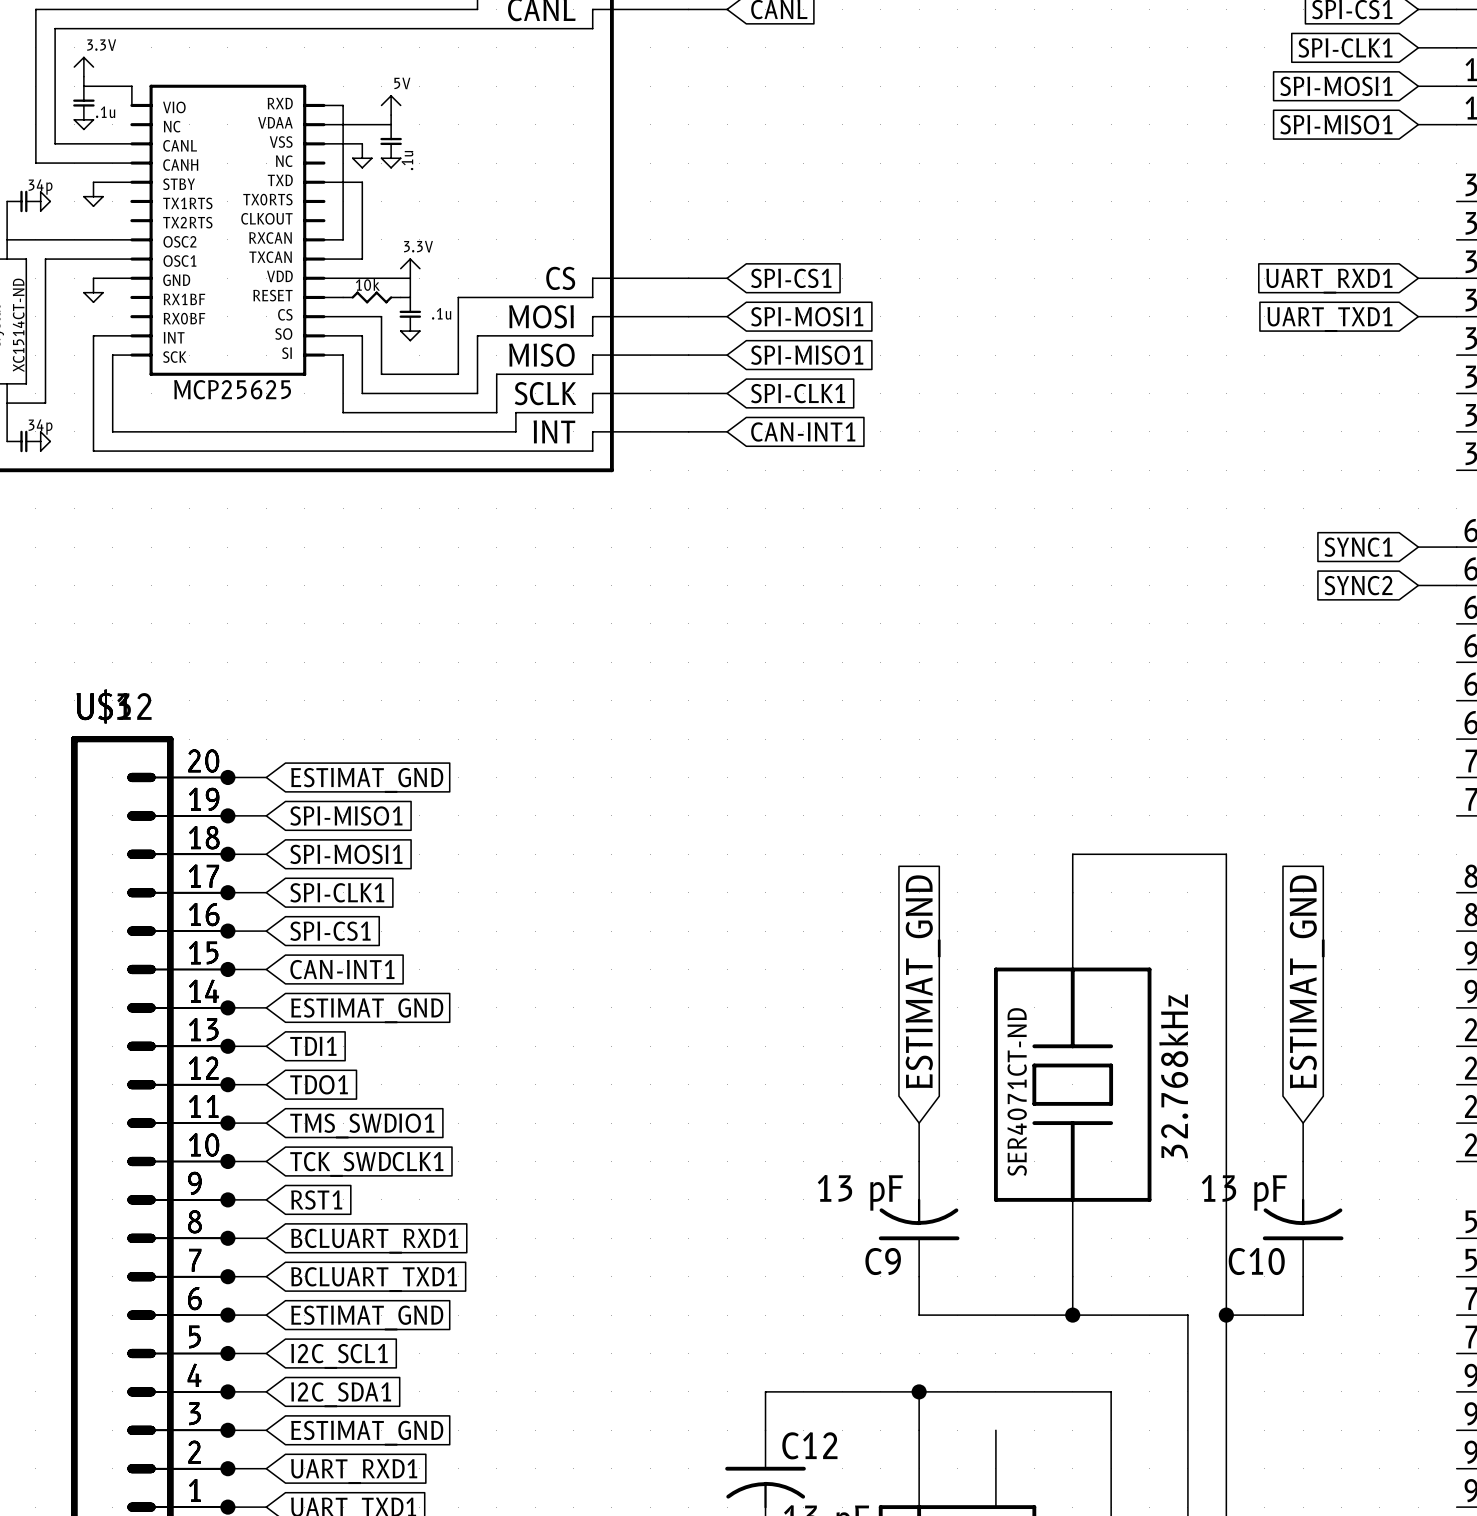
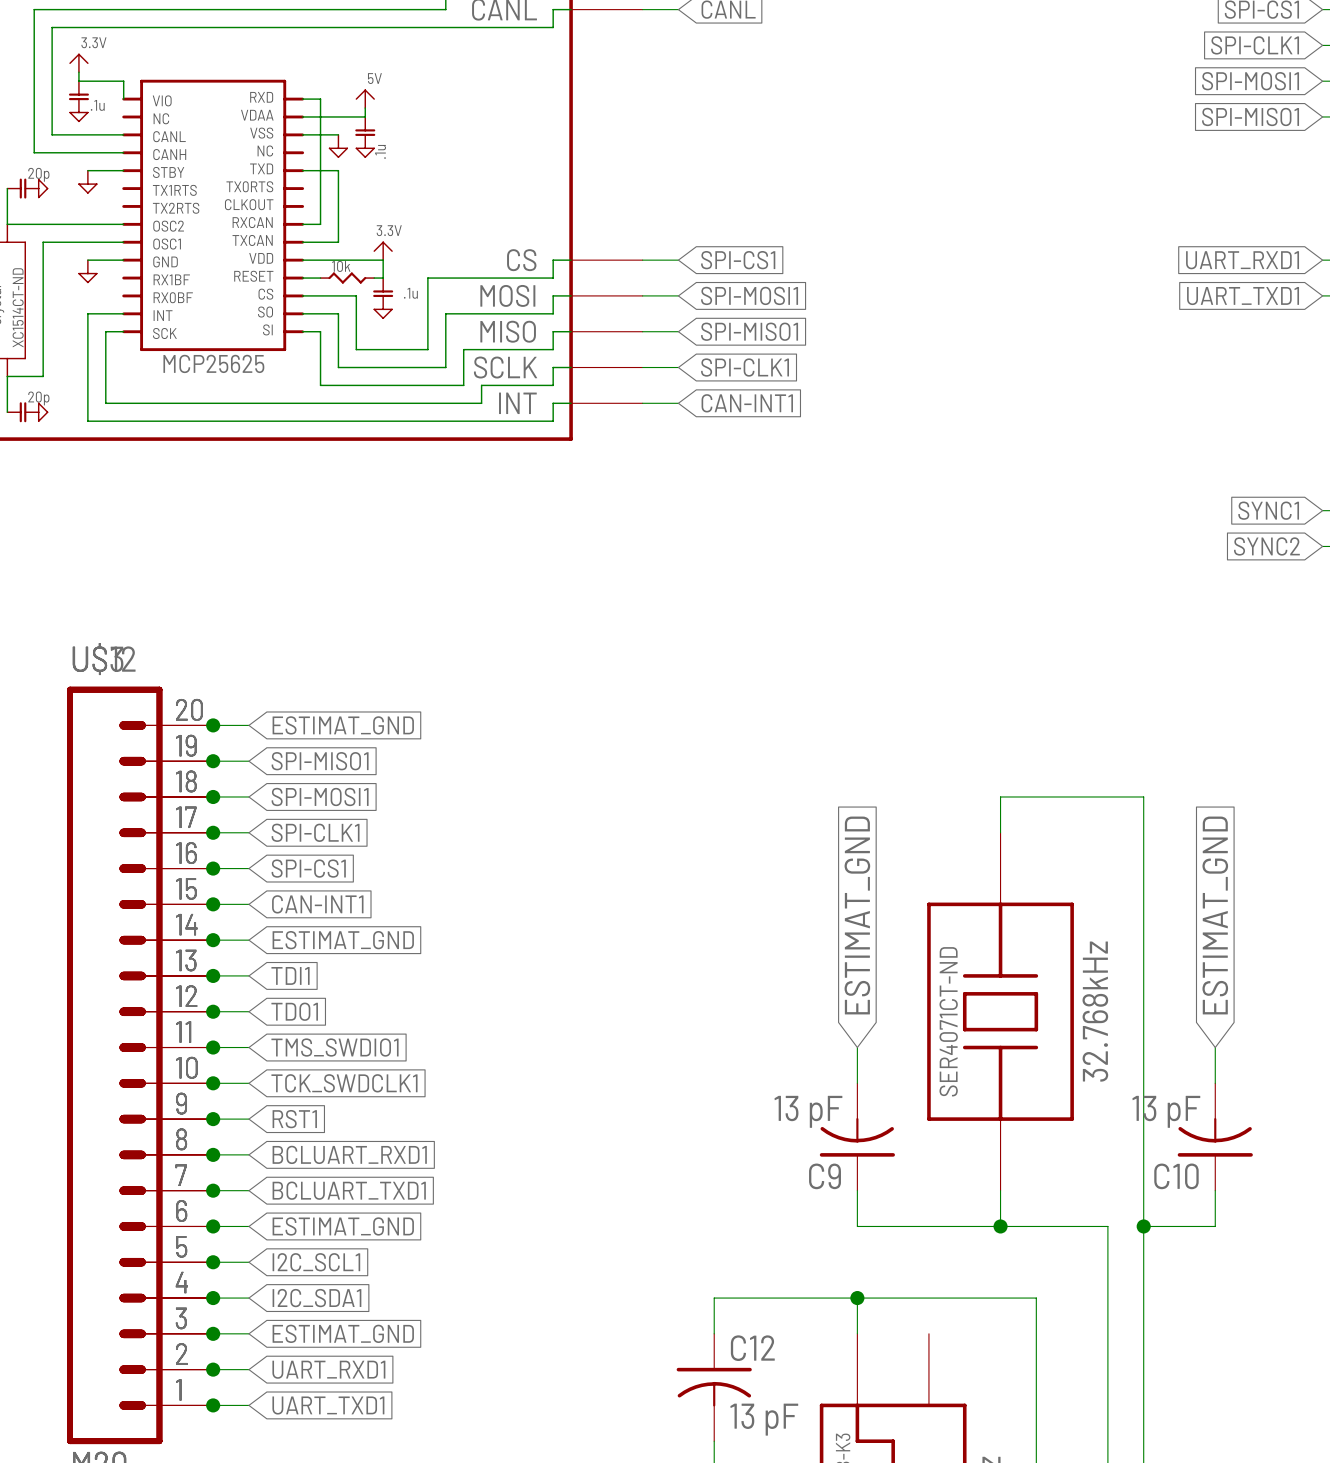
part text: 34p (40, 187) -> 20p (38, 174)
part text: 34p (40, 427) -> 20p (38, 398)

